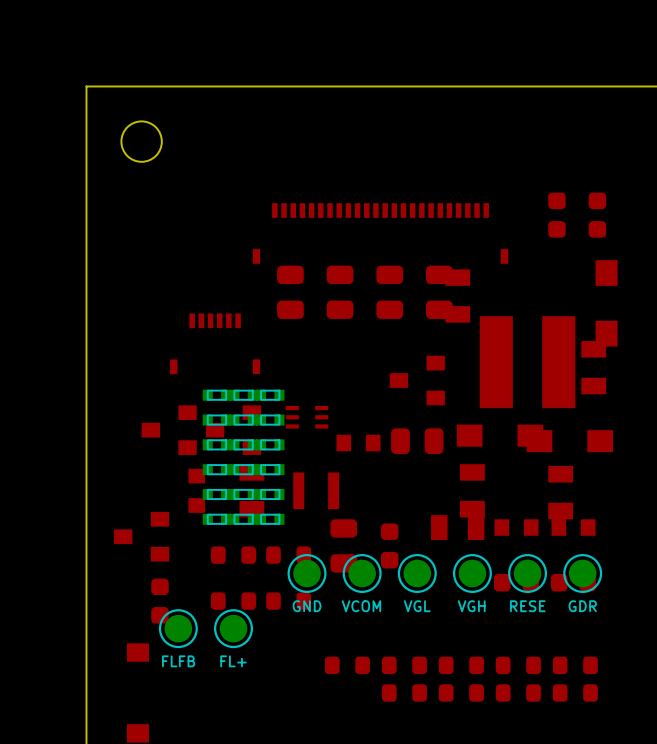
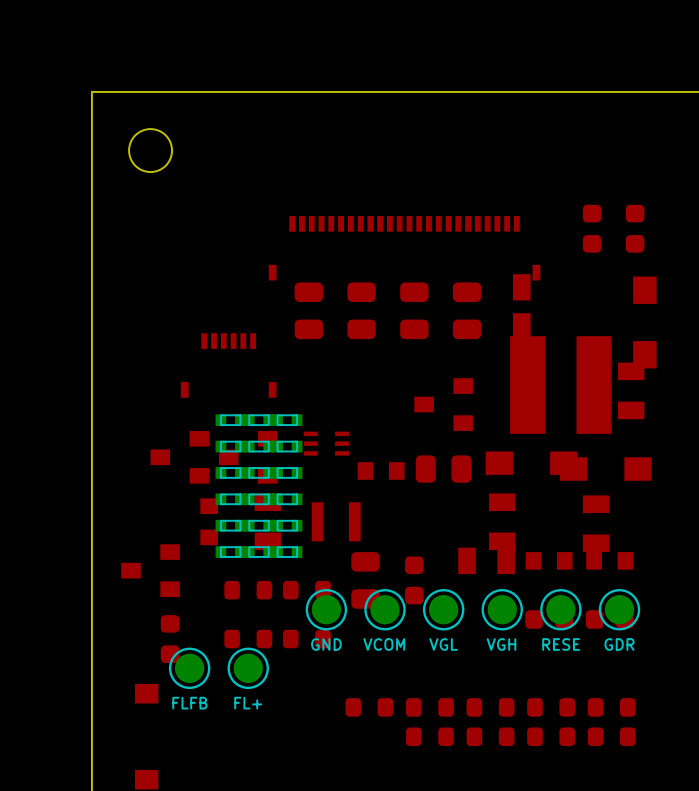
part: none -> (521, 306)
part: (457, 295) -> none

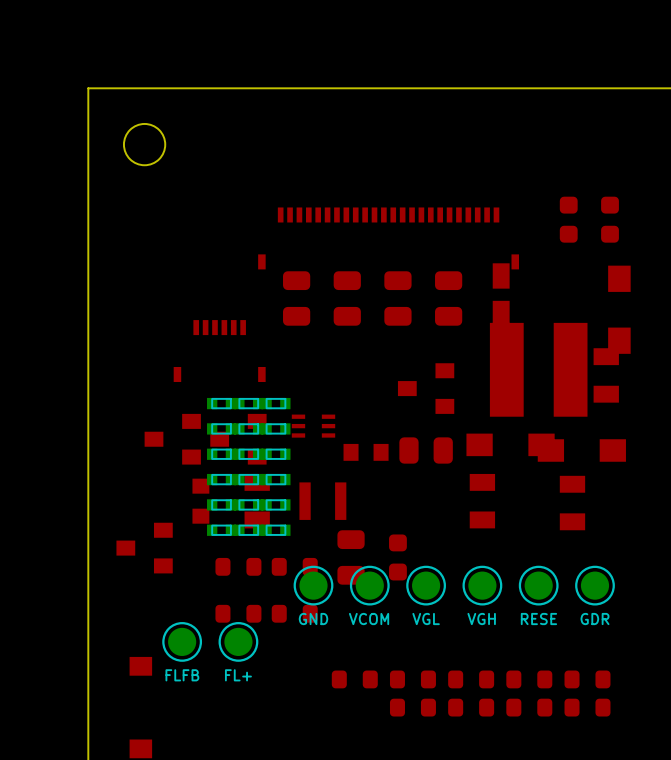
part: (486, 560) -> none
part: (549, 560) -> none
part: (609, 560) -> none
part: (549, 619) -> none
part: (609, 619) -> none
part: (170, 639) -> none

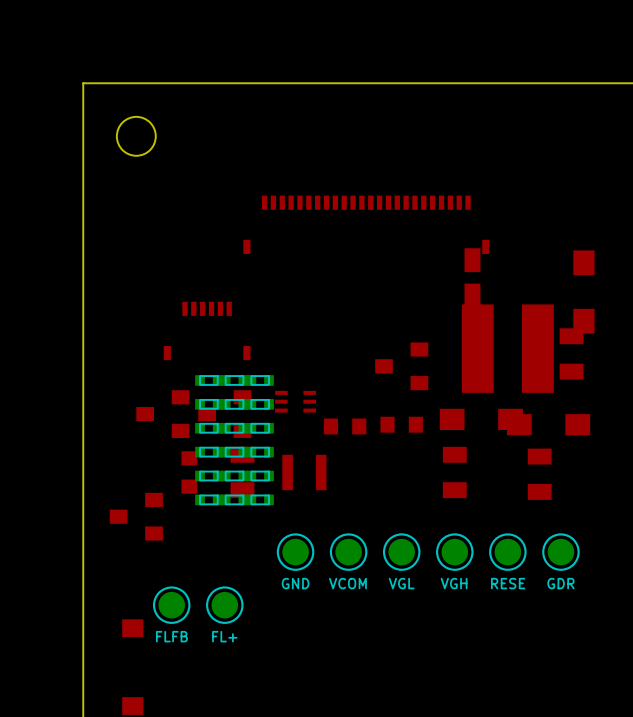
part: (568, 219) -> none
part: (610, 219) -> none
part: (296, 298) -> none
part: (347, 298) -> none
part: (397, 298) -> none
part: (448, 298) -> none
part footprint: [399, 437, 453, 464] -> [380, 416, 423, 433]
part: (351, 557) -> none
part: (397, 557) -> none
part: (238, 566) -> none
part: (294, 566) -> none
part: (238, 613) -> none
part: (294, 613) -> none
part: (354, 679) -> none
part: (412, 679) -> none
part: (471, 679) -> none
part: (529, 679) -> none
part: (587, 679) -> none
part: (412, 707) -> none
part: (471, 707) -> none
part: (529, 707) -> none
part: (587, 707) -> none

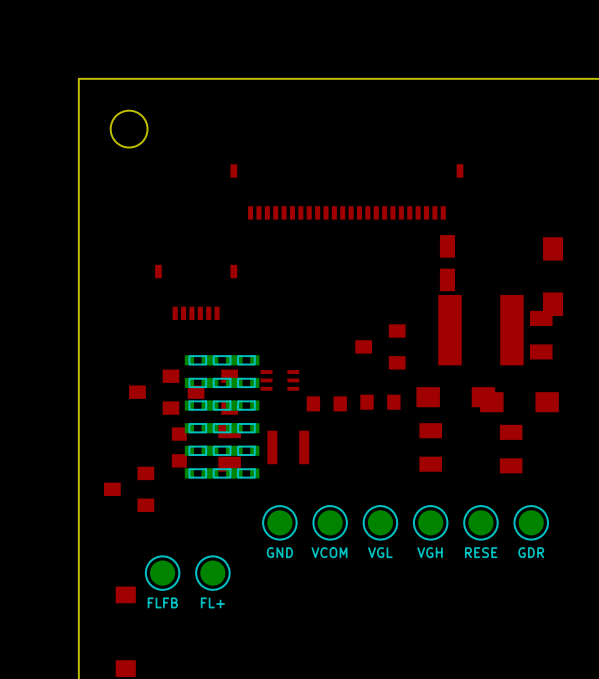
part rotation: 0° (366, 224) -> 180° (346, 191)
part footprint: [461, 304, 554, 393] -> [438, 294, 524, 366]
part rotation: 0° (207, 330) -> 180° (196, 292)

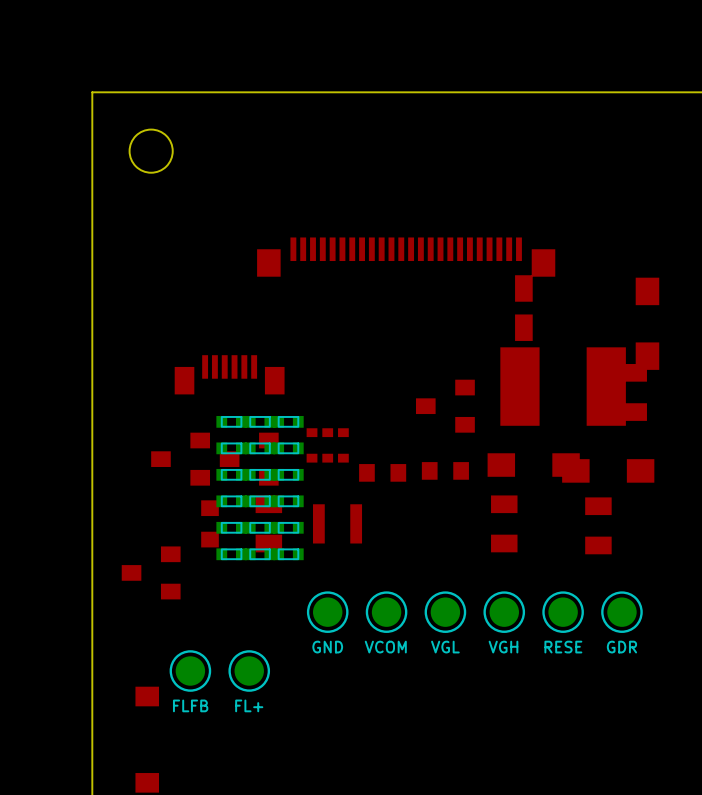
part: (346, 191) -> none
part: none -> (406, 257)
part: (196, 292) -> none
part footprint: [438, 294, 524, 366] -> [500, 347, 626, 426]
part: none -> (229, 374)
part footprint: [260, 370, 300, 391] -> [306, 428, 349, 463]

